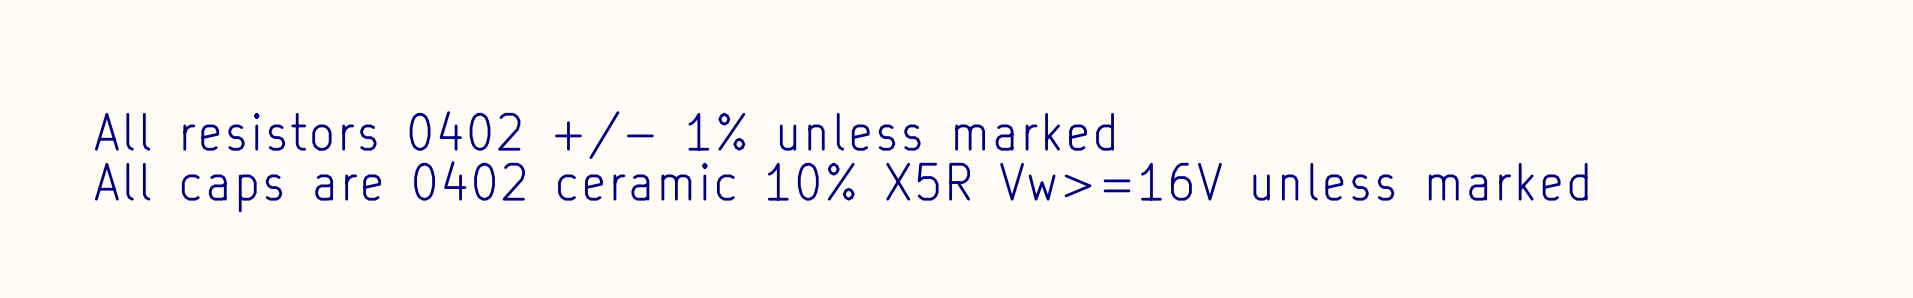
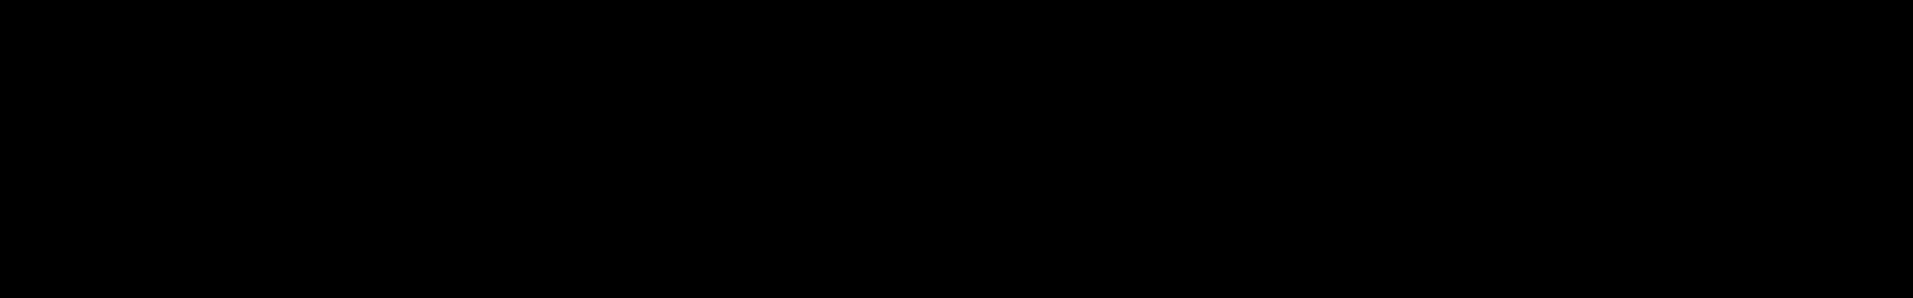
text: All resistors 0402 +/- 1% unless marked (604, 135) -> none
text: All caps are 0402 ceramic 10% X5R Vw>=16V unless marked (841, 186) -> none

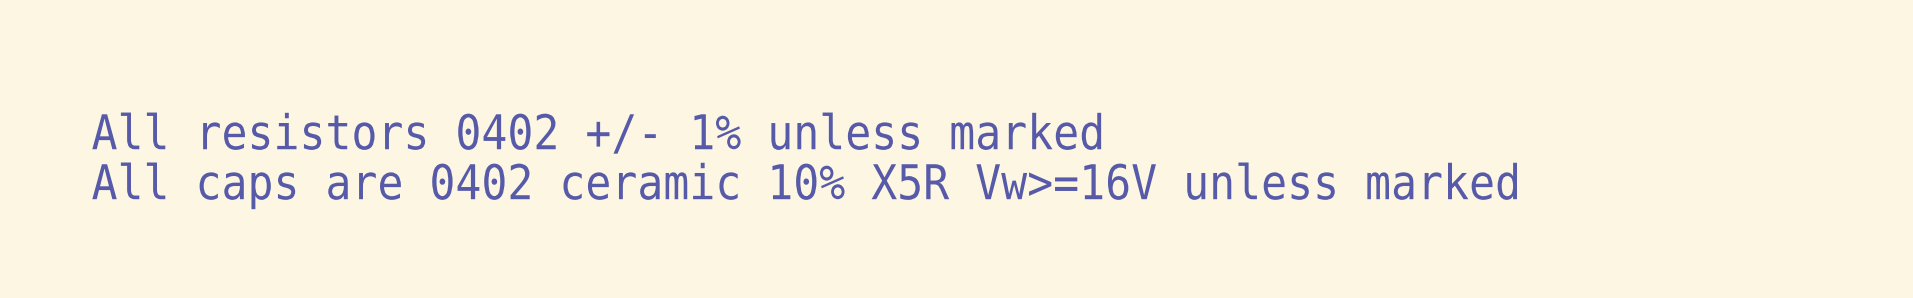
text: none -> All resistors 0402 +/- 1% unless marked (596, 133)
text: none -> All caps are 0402 ceramic 10% X5R Vw>=16V unless marked (804, 185)

